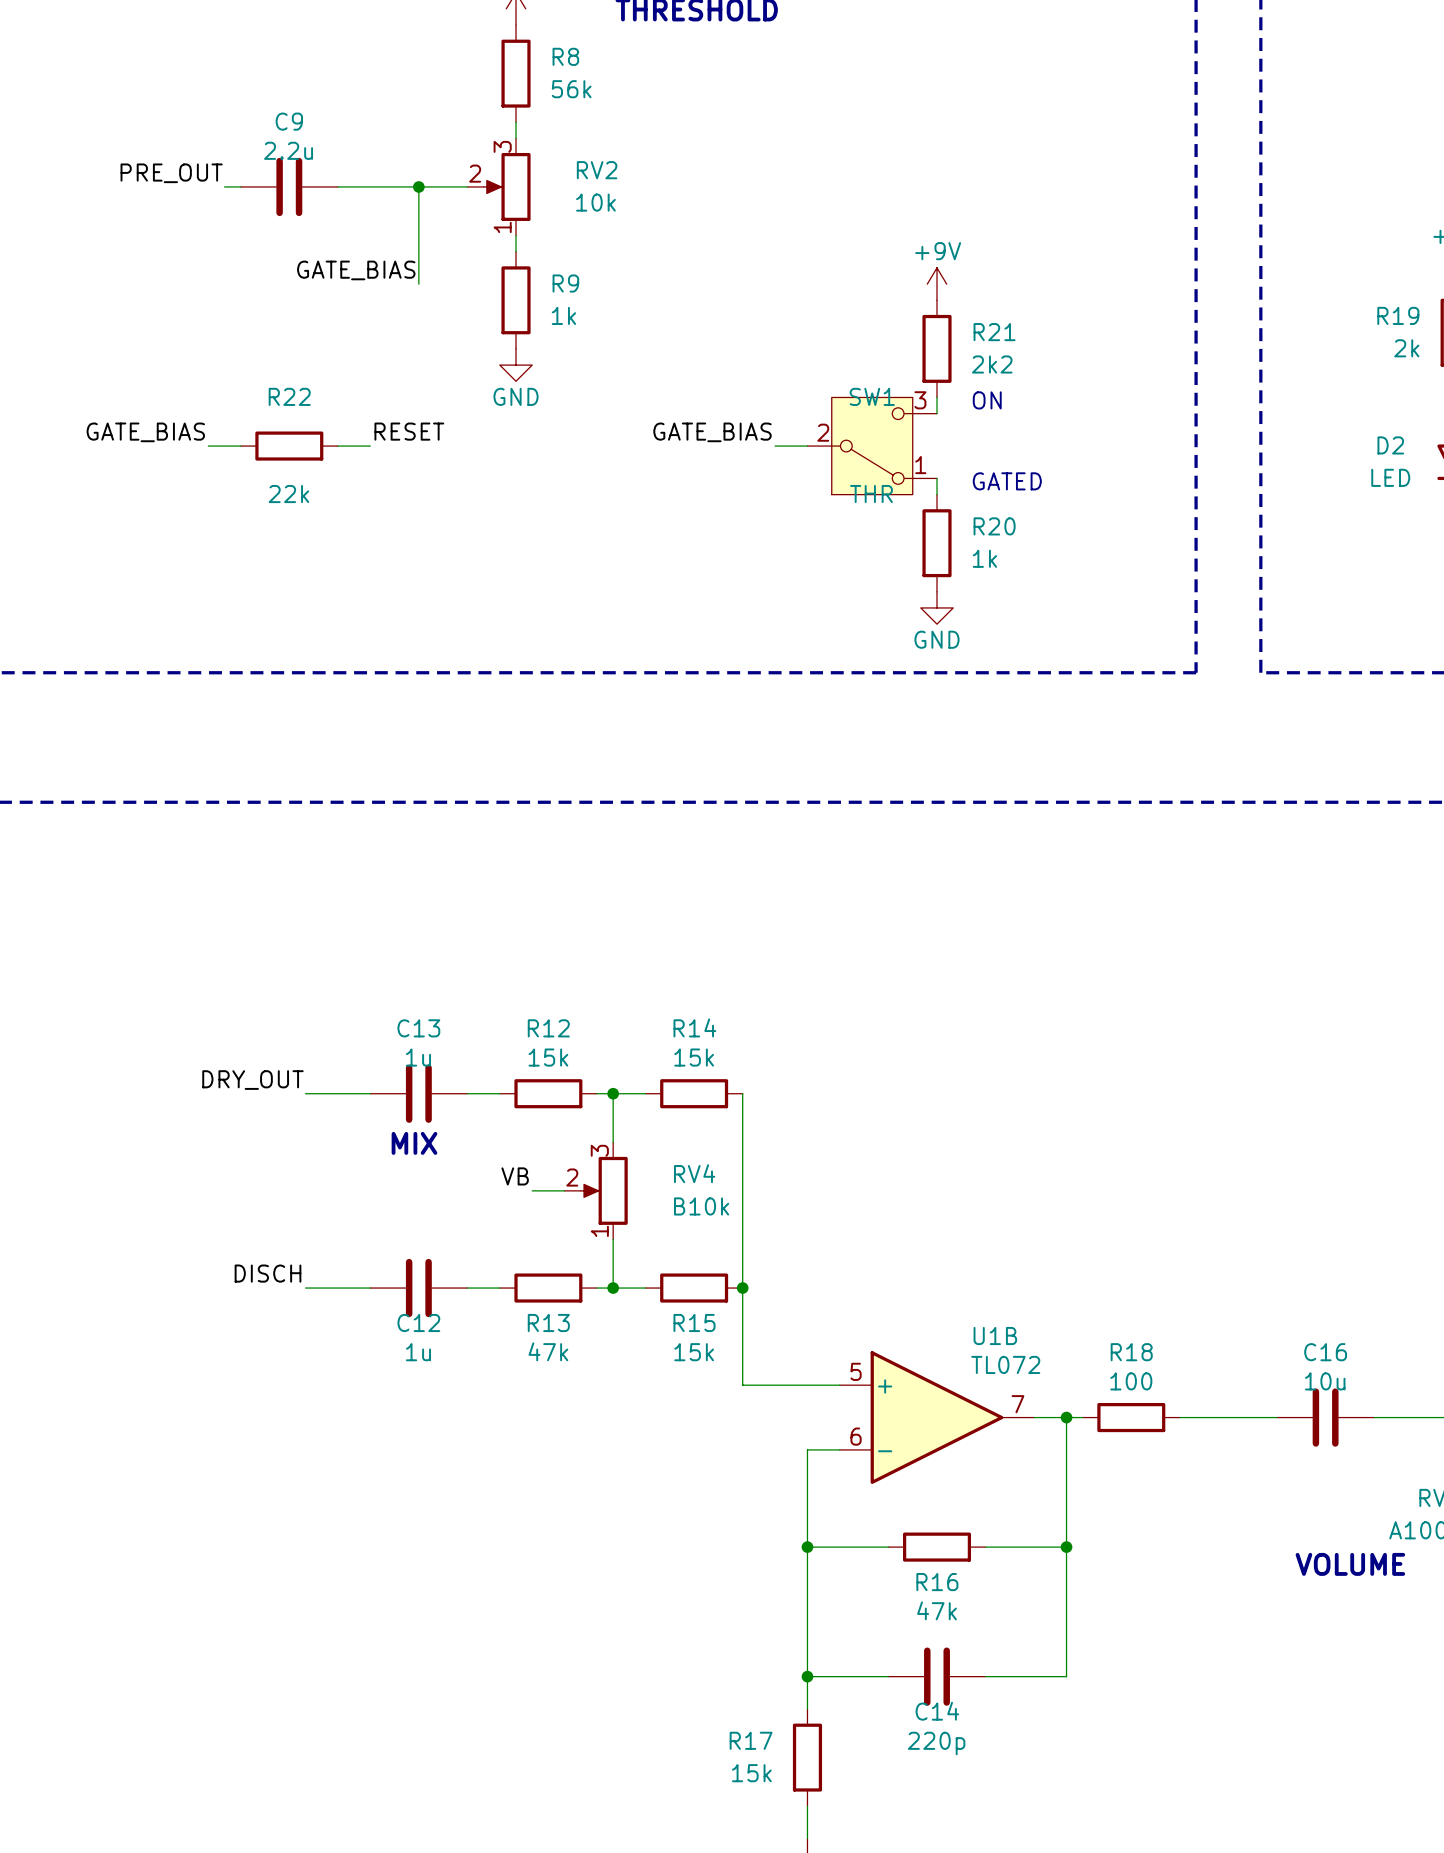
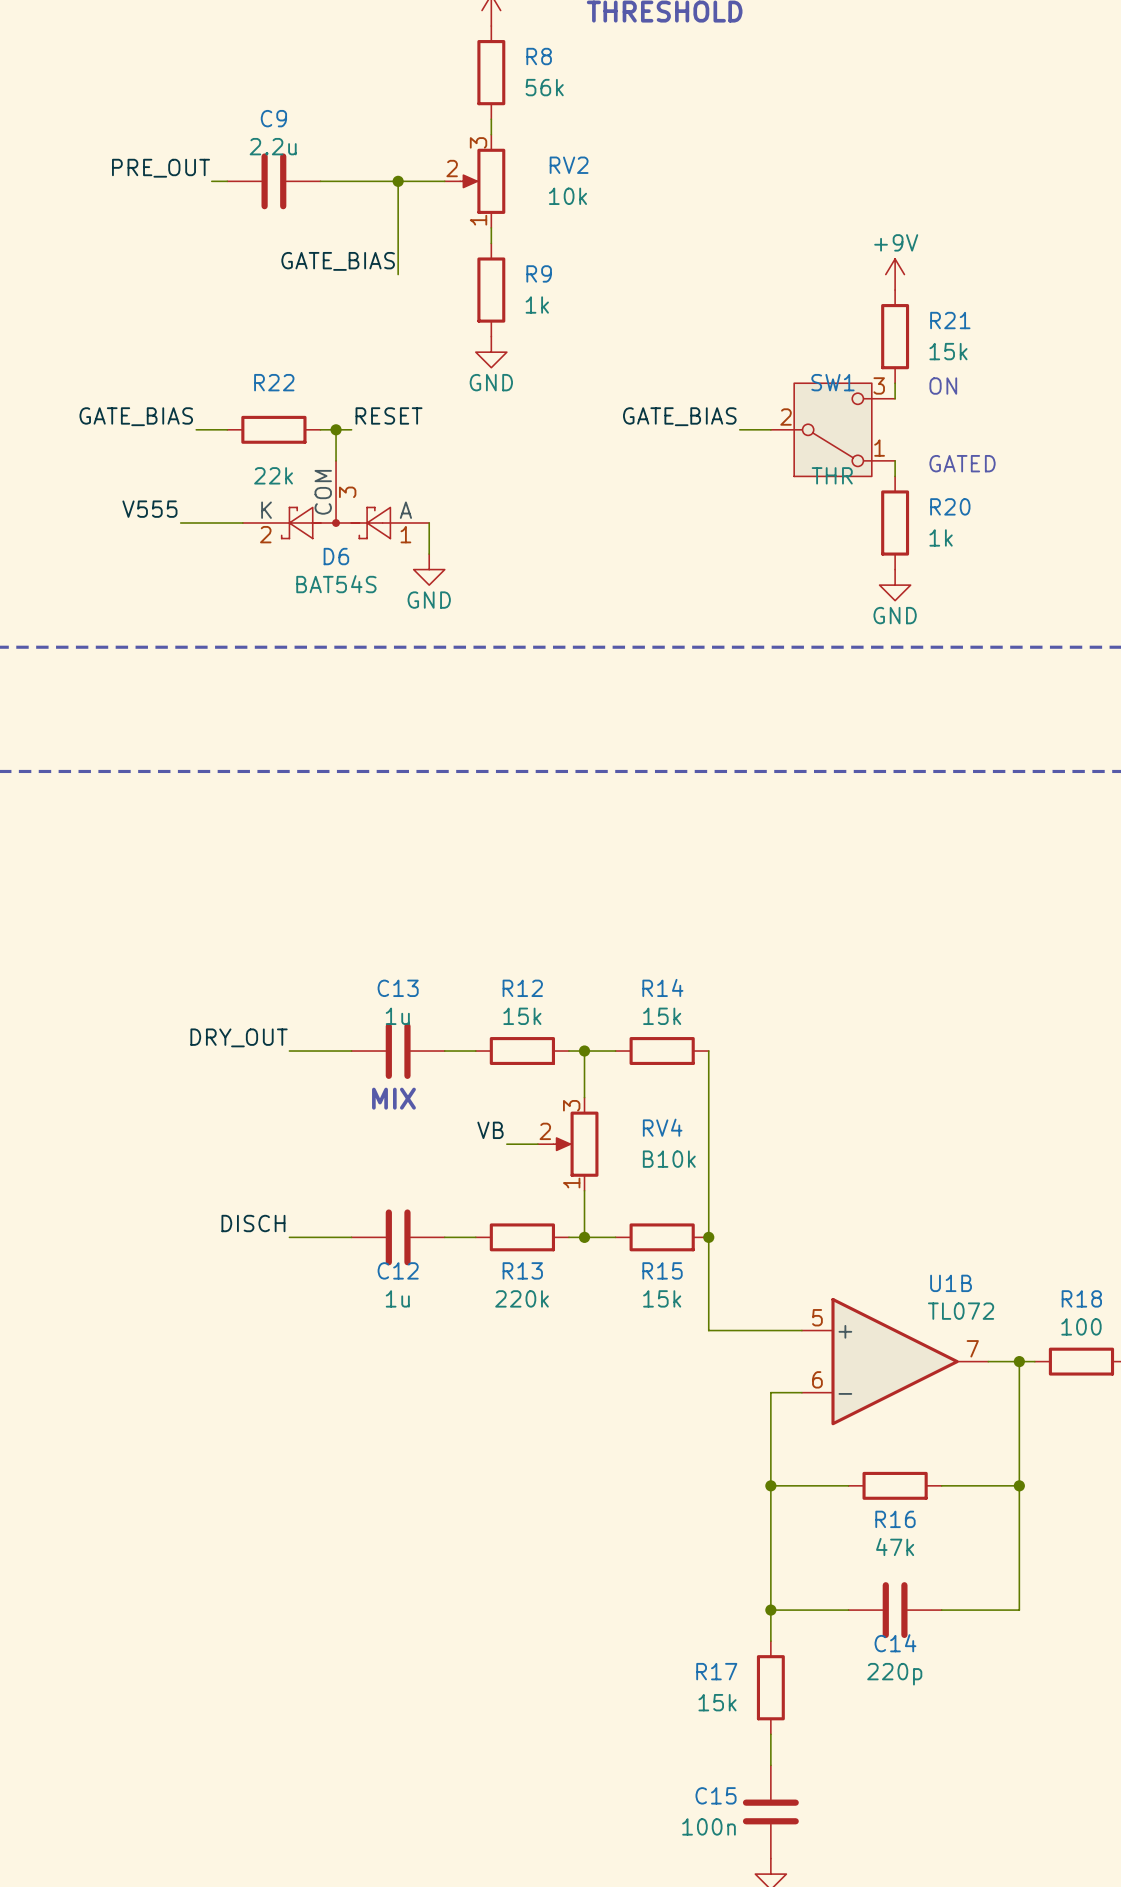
R21 value: 2k2 (992, 364) -> 15k (948, 351)
wire: none -> (336, 429) (336, 460)
junction: none -> (336, 429)
D6: none -> BAT54S (336, 499)
label: none -> V555 (149, 509)
wire: none -> (180, 522) (242, 522)
wire: none -> (429, 522) (429, 554)
power symbol: none -> GND (429, 569)
R13 value: 47k (548, 1351) -> 220k (522, 1298)

